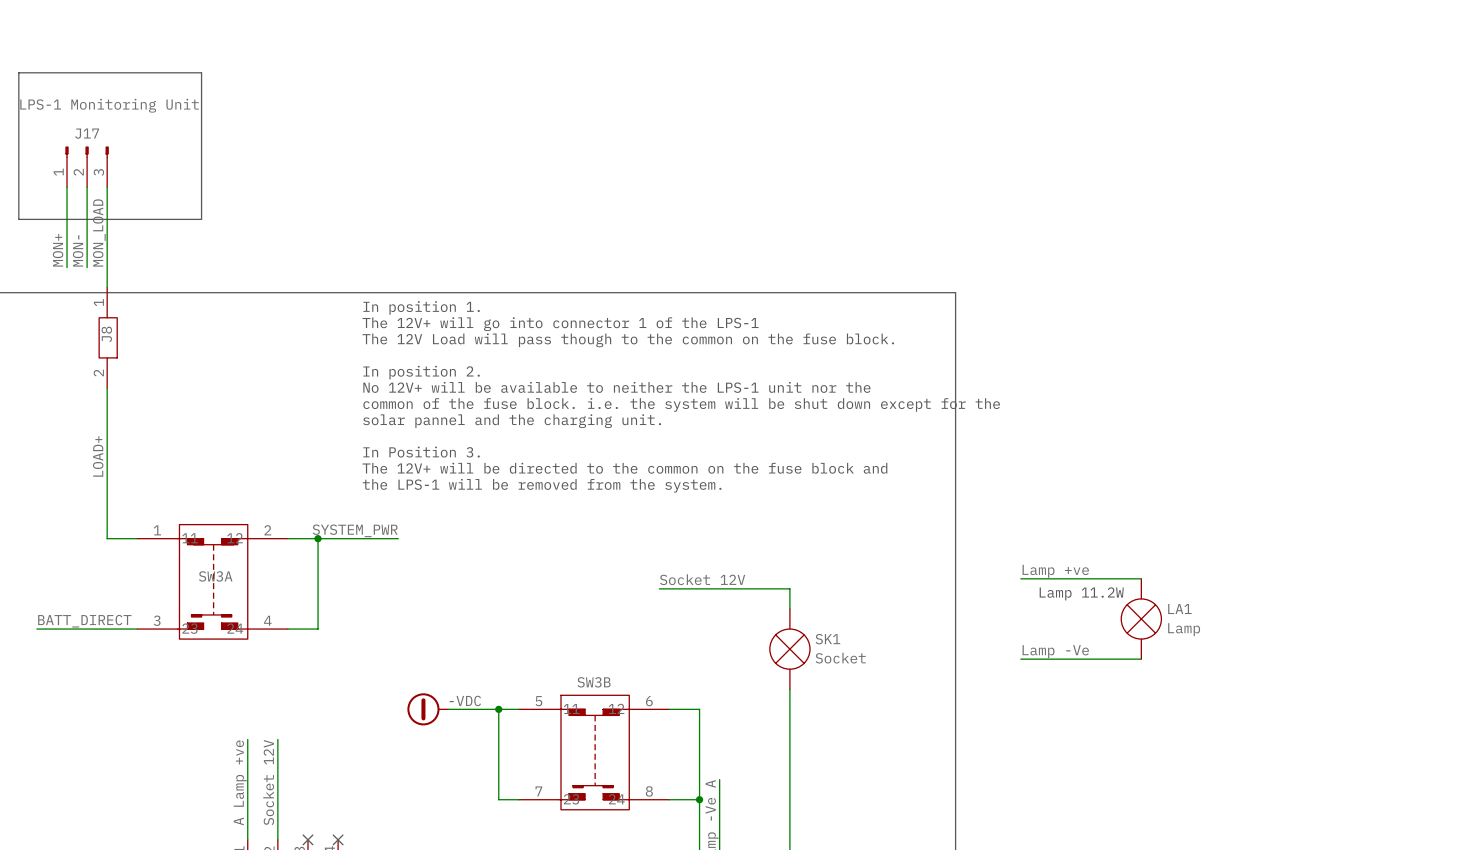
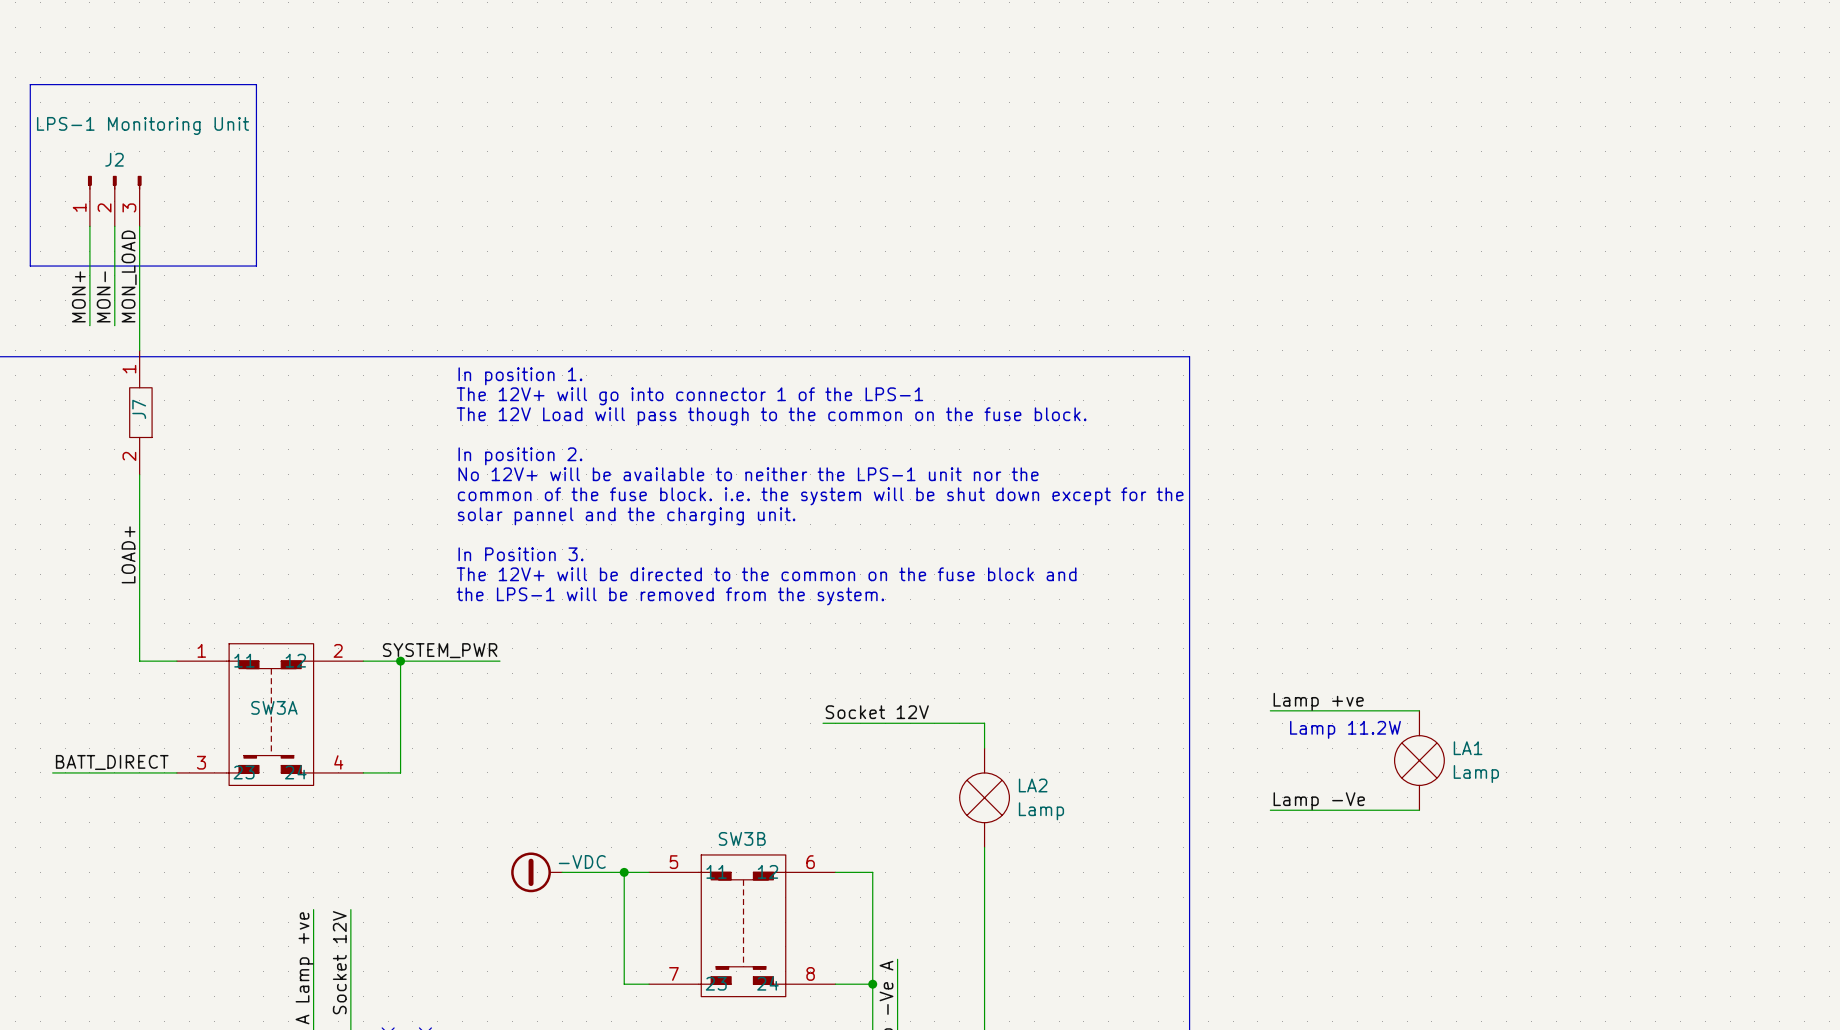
J17 name: J17 (87, 133) -> J2 (114, 159)
J8 name: J8 (106, 334) -> J7 (139, 409)
SK1 name: SK1 (827, 639) -> LA2 (1033, 785)
SK1 value: Socket (840, 658) -> Lamp (1041, 811)

